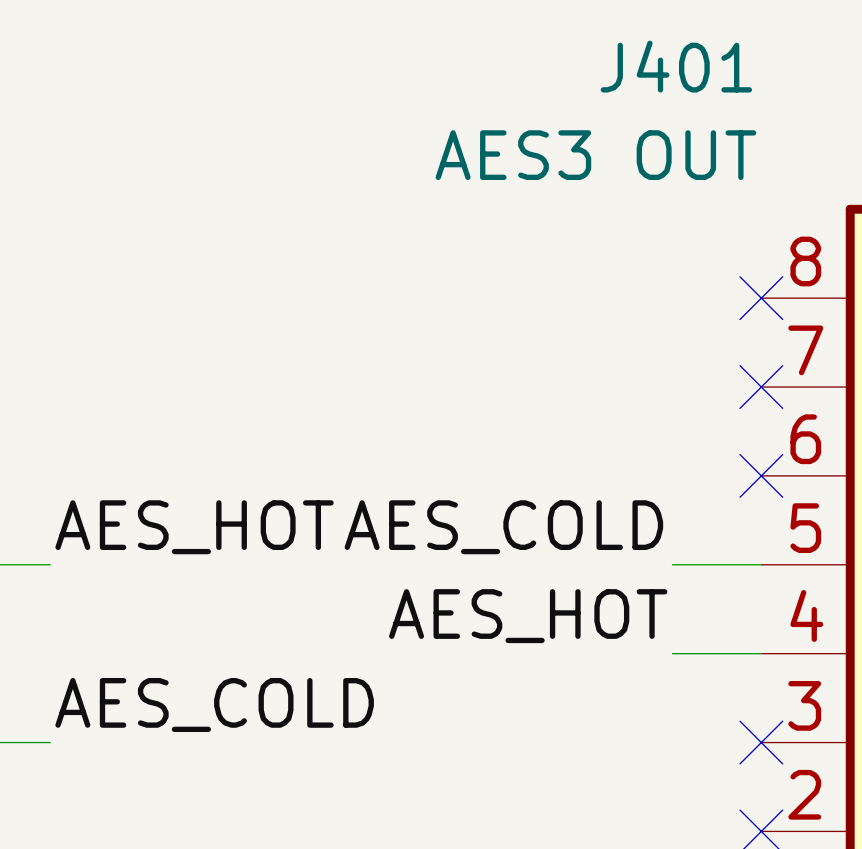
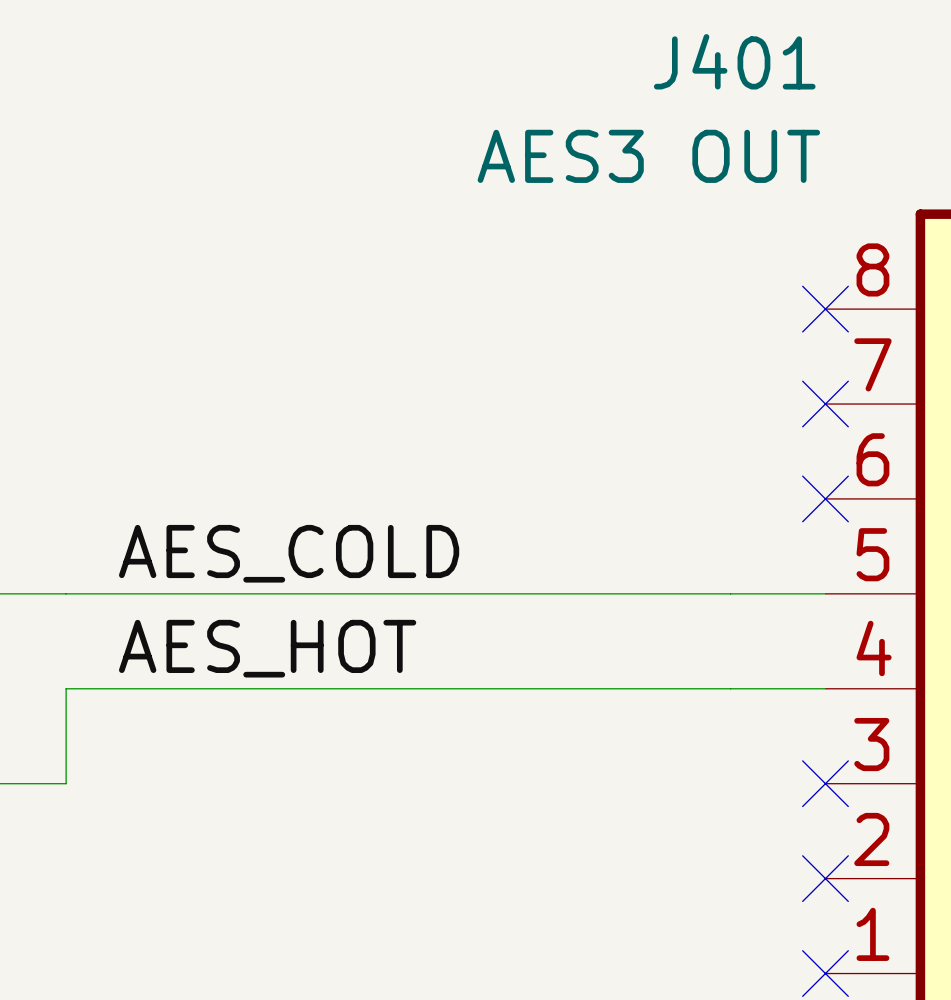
label position: AES_HOT (194, 527) -> AES_HOT (267, 648)
label: AES_COLD (503, 527) -> none
wire: none -> (66, 593) (730, 593)
label: AES_HOT (528, 616) -> none
wire: none -> (730, 688) (66, 688) (66, 783)
label position: AES_COLD (214, 705) -> AES_COLD (289, 553)

